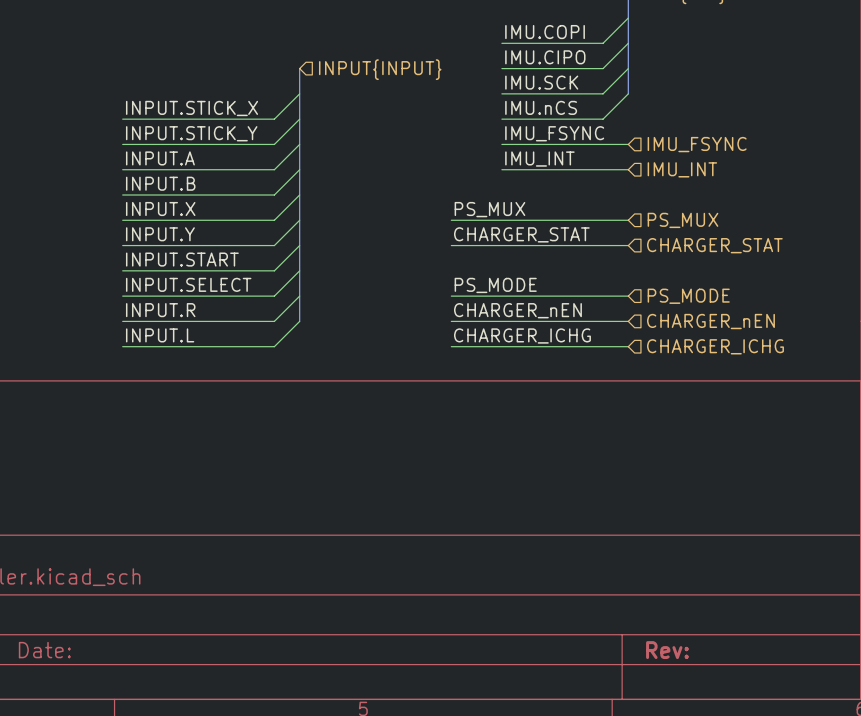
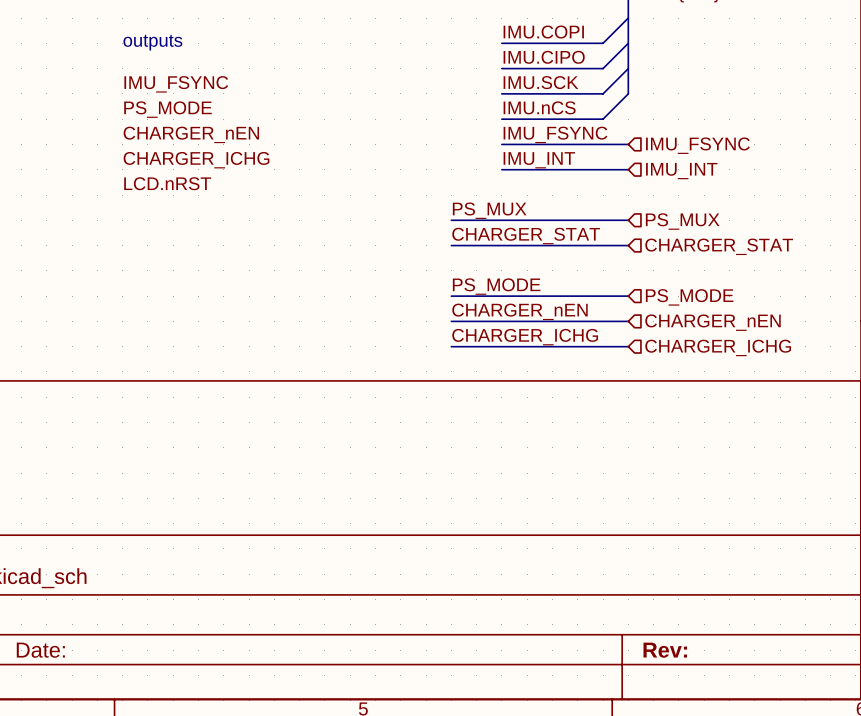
text: none -> outputs (152, 42)
bus: (299, 68) (299, 321) -> none
hierarchical label: INPUT{INPUT} (380, 69) -> none
label: none -> IMU_FSYNC (176, 84)
wire: (299, 93) (274, 119) (122, 119) -> none
label: INPUT.STICK_X (192, 108) -> PS_MODE (167, 109)
wire: (299, 119) (274, 144) (122, 144) -> none
label: INPUT.STICK_Y (191, 133) -> CHARGER_nEN (191, 134)
wire: (299, 144) (274, 169) (122, 169) -> none
label: INPUT.A (160, 158) -> CHARGER_ICHG (196, 160)
wire: (299, 169) (274, 195) (122, 195) -> none
label: INPUT.B (160, 183) -> LCD.nRST (167, 183)
wire: (299, 195) (274, 220) (122, 220) -> none
label: INPUT.X (160, 209) -> none
wire: (299, 220) (274, 245) (122, 245) -> none
label: INPUT.Y (160, 234) -> none
wire: (299, 245) (274, 270) (122, 270) -> none
label: INPUT.START (182, 259) -> none
wire: (299, 270) (274, 296) (122, 296) -> none
label: INPUT.SELECT (188, 284) -> none
wire: (299, 296) (274, 321) (122, 321) -> none
label: INPUT.R (160, 310) -> none
wire: (299, 321) (274, 346) (122, 346) -> none
label: INPUT.L (160, 335) -> none

